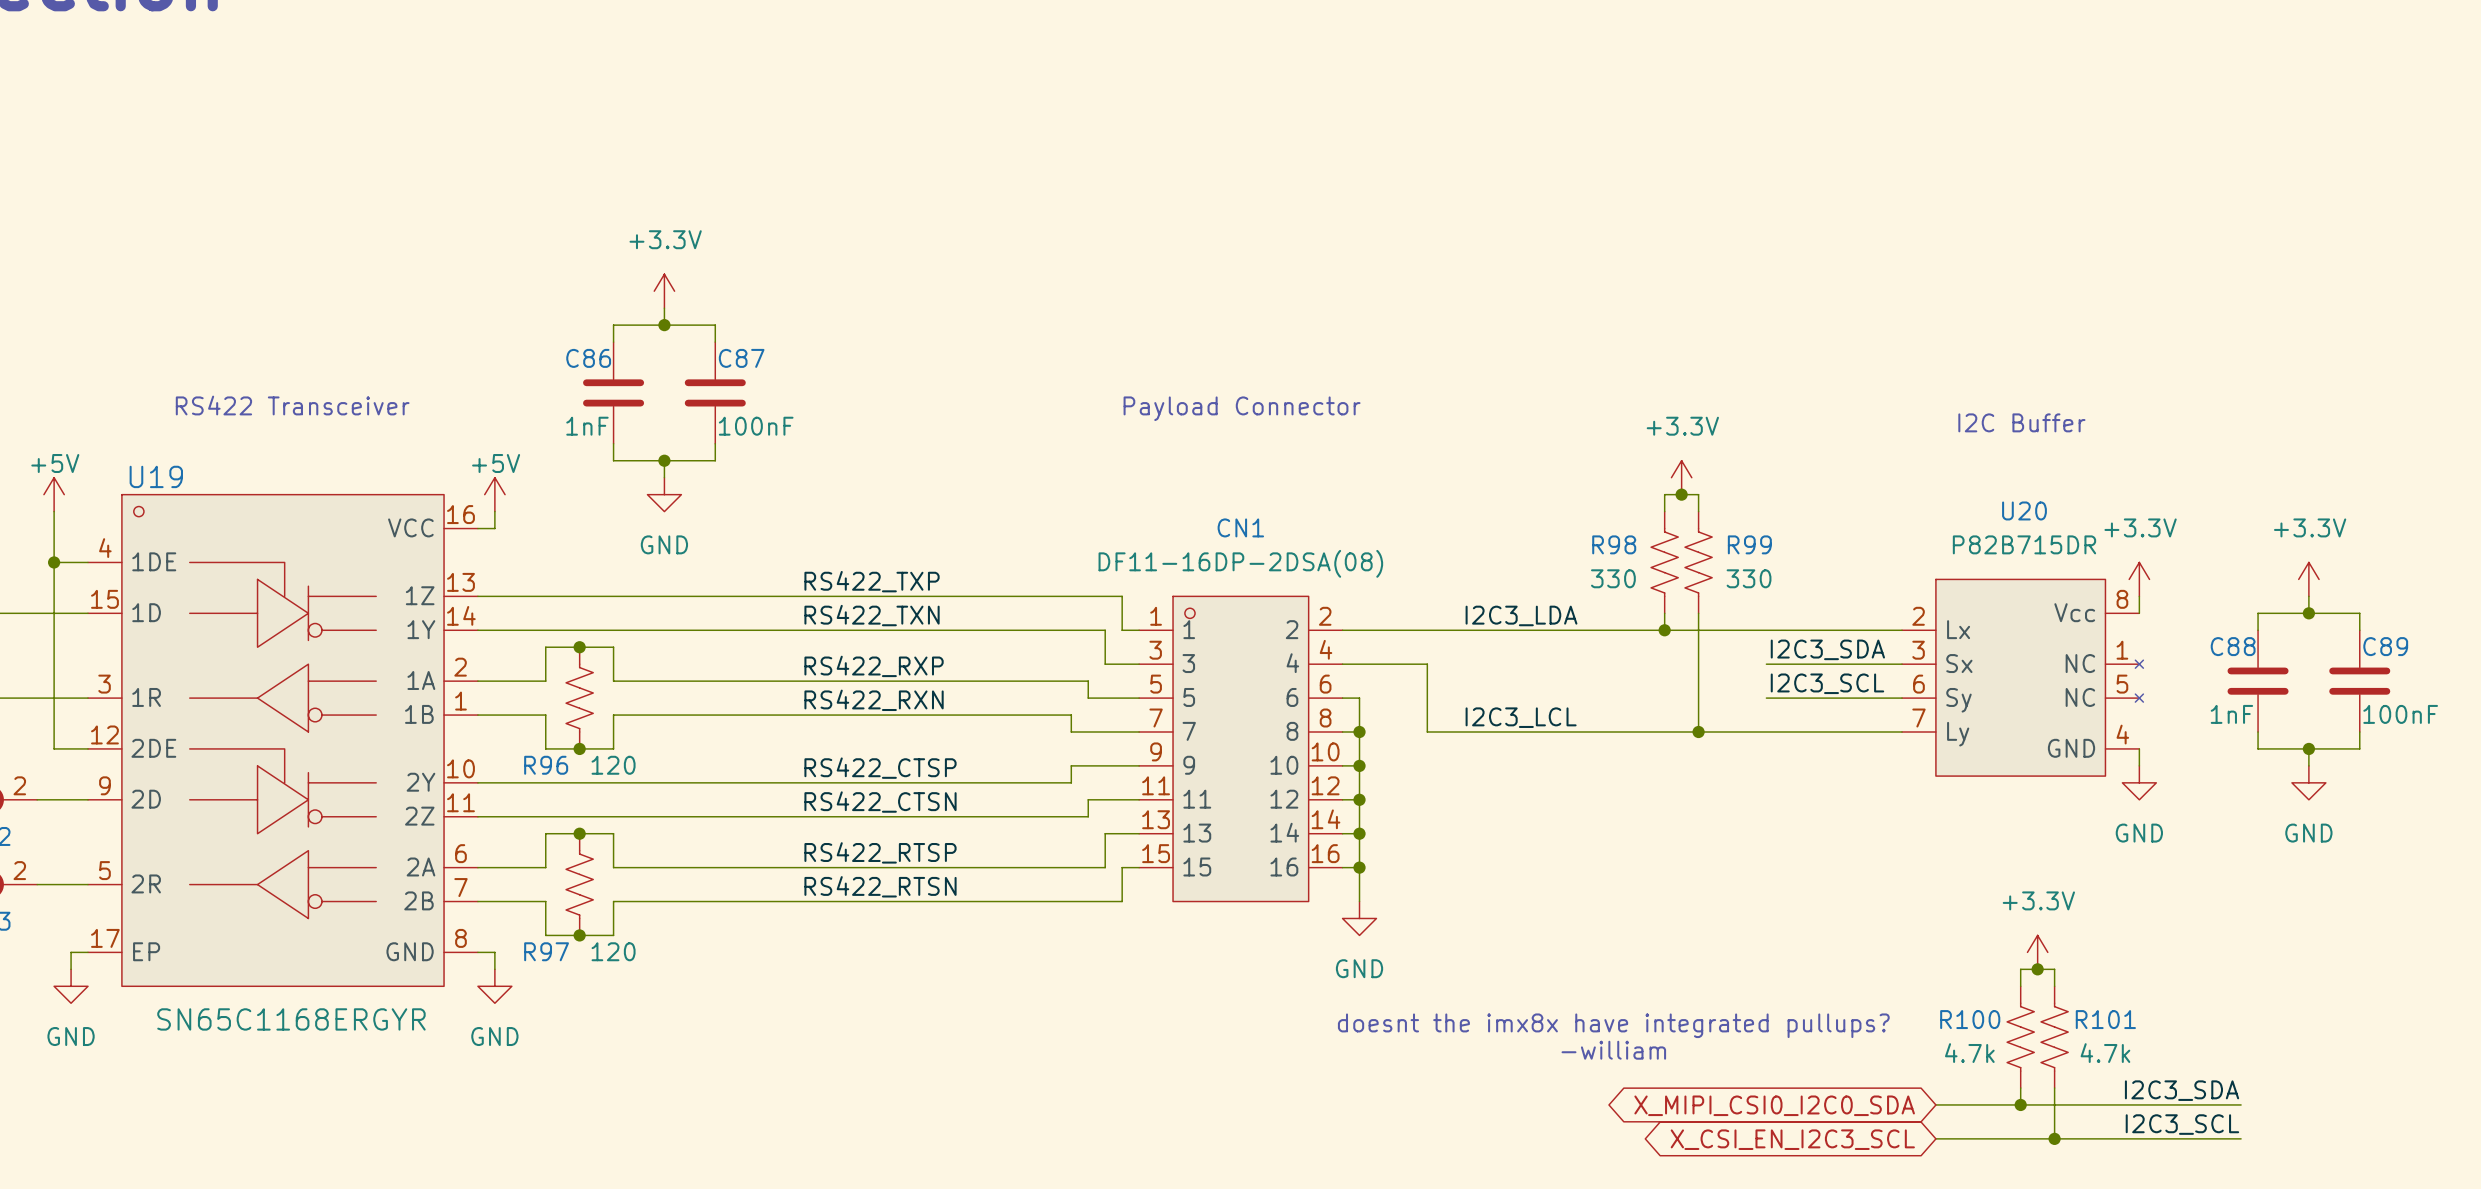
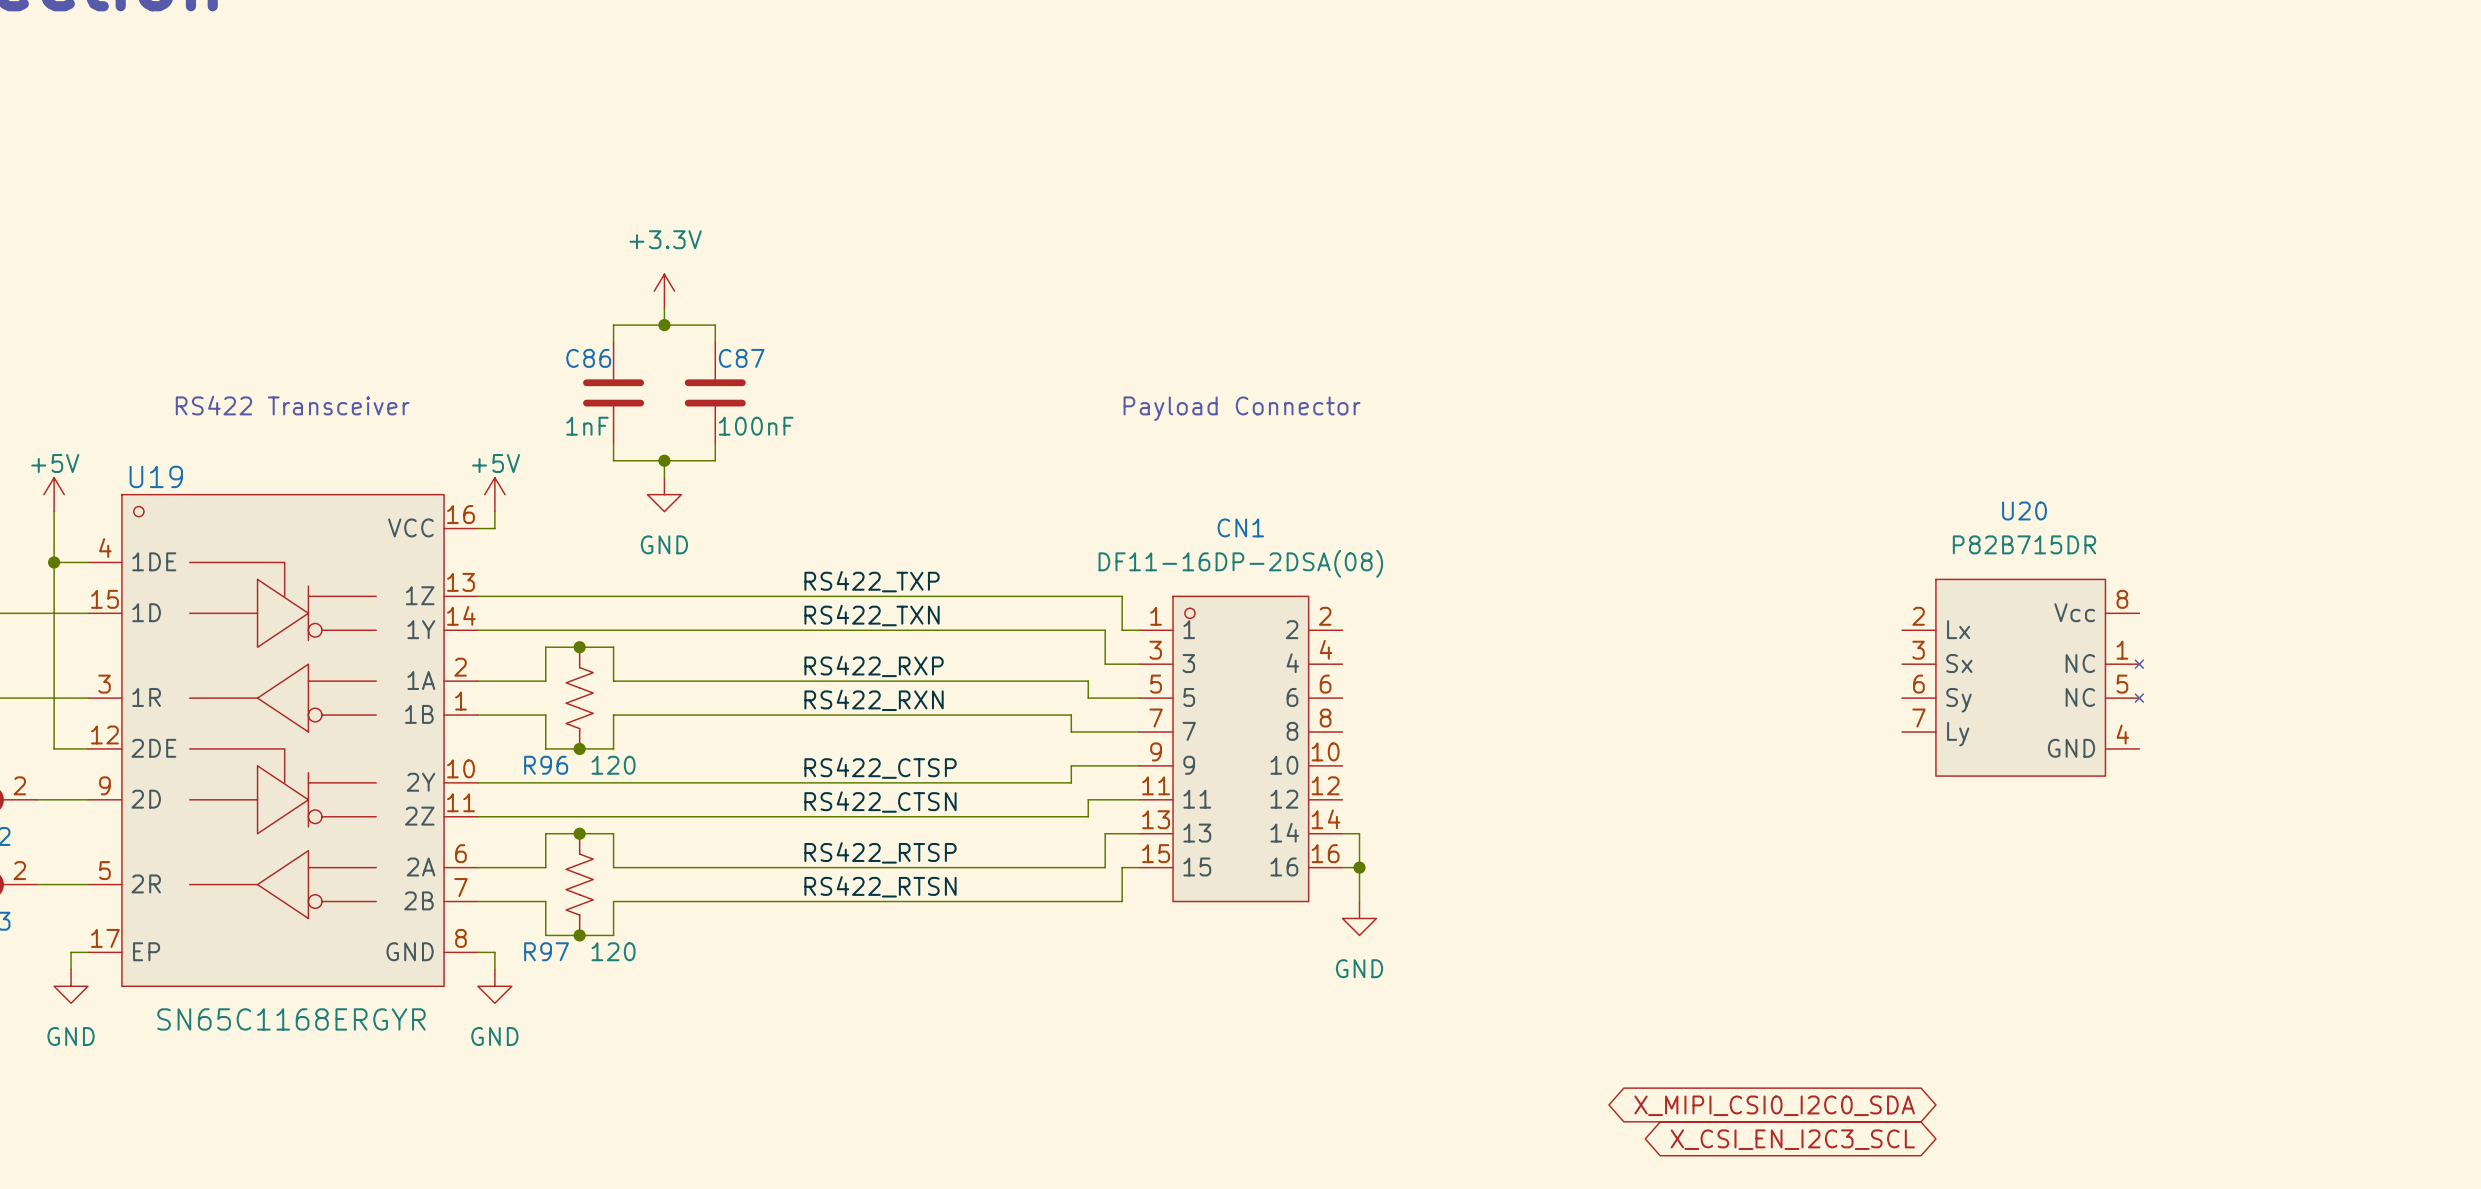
text: I2C Buffer (2021, 422) -> none
power symbol: +3.3V (1681, 477) -> none
junction: (1681, 494) -> none
wire: (1664, 511) (1664, 494) (1698, 494) (1698, 511) -> none
R98: 330 (1664, 562) -> none
R99: 330 (1698, 562) -> none
power symbol: +3.3V (2139, 579) -> none
power symbol: +3.3V (2308, 579) -> none
wire: (2139, 596) (2139, 613) -> none
wire: (2308, 596) (2308, 613) -> none
wire: (1664, 613) (1664, 630) -> none
wire: (1698, 613) (1698, 731) -> none
junction: (2308, 613) -> none
label: I2C3_LDA (1521, 615) -> none
wire: (1342, 630) (1902, 630) -> none
junction: (1664, 630) -> none
wire: (2258, 630) (2258, 613) (2359, 613) (2359, 630) -> none
label: I2C3_SDA (1827, 649) -> none
wire: (1342, 664) (1427, 664) (1427, 731) (1902, 731) -> none
wire: (1766, 664) (1902, 664) -> none
C88: 1nF (2258, 681) -> none
C89: 100nF (2359, 681) -> none
label: I2C3_SCL (1827, 683) -> none
wire: (1342, 698) (1359, 698) (1359, 833) -> none
wire: (1766, 698) (1902, 698) -> none
label: I2C3_LCL (1521, 717) -> none
wire: (1342, 731) (1359, 731) -> none
junction: (1359, 731) -> none
junction: (1698, 731) -> none
wire: (2258, 731) (2258, 748) (2359, 748) (2359, 731) -> none
wire: (2139, 748) (2139, 765) -> none
wire: (2308, 748) (2308, 765) -> none
junction: (2308, 748) -> none
wire: (1342, 765) (1359, 765) -> none
junction: (1359, 765) -> none
power symbol: GND (2139, 782) -> none
power symbol: GND (2308, 782) -> none
wire: (1342, 799) (1359, 799) -> none
junction: (1359, 799) -> none
junction: (1359, 833) -> none
power symbol: +3.3V (2037, 952) -> none
junction: (2037, 969) -> none
wire: (2020, 986) (2020, 969) (2054, 969) (2054, 986) -> none
text: doesnt the imx8x have integrated pullups? (1613, 1025) -> none
R100: 4.7k (2020, 1037) -> none
R101: 4.7k (2054, 1037) -> none
text: -william (1613, 1050) -> none
wire: (2020, 1088) (2020, 1104) -> none
wire: (2054, 1088) (2054, 1138) -> none
label: I2C3_SDA (2182, 1090) -> none
wire: (1935, 1104) (2241, 1104) -> none
junction: (2020, 1104) -> none
label: I2C3_SCL (2182, 1124) -> none
wire: (1935, 1138) (2241, 1138) -> none
junction: (2054, 1138) -> none

